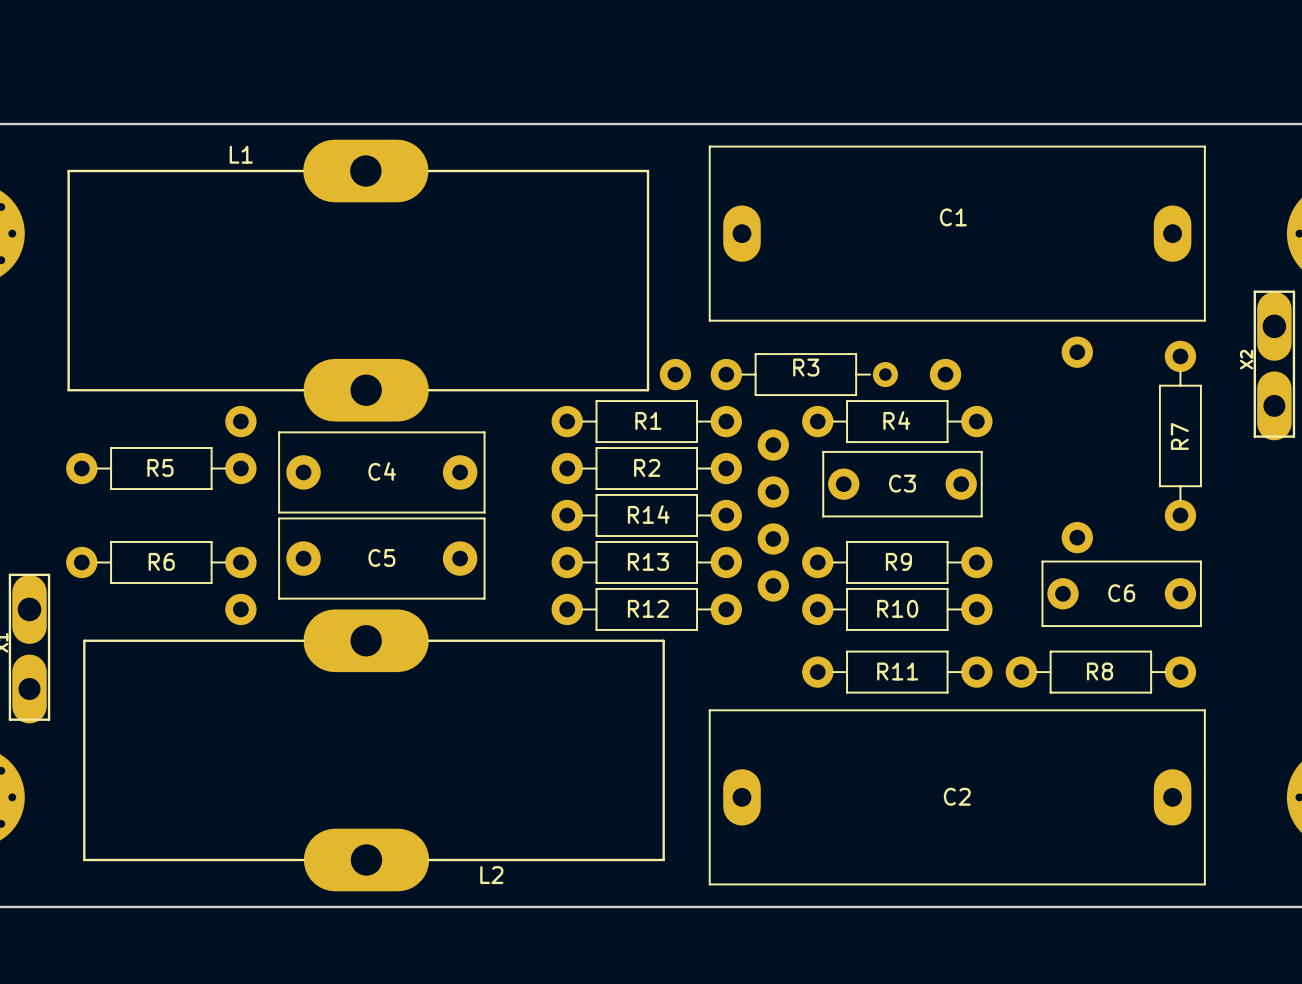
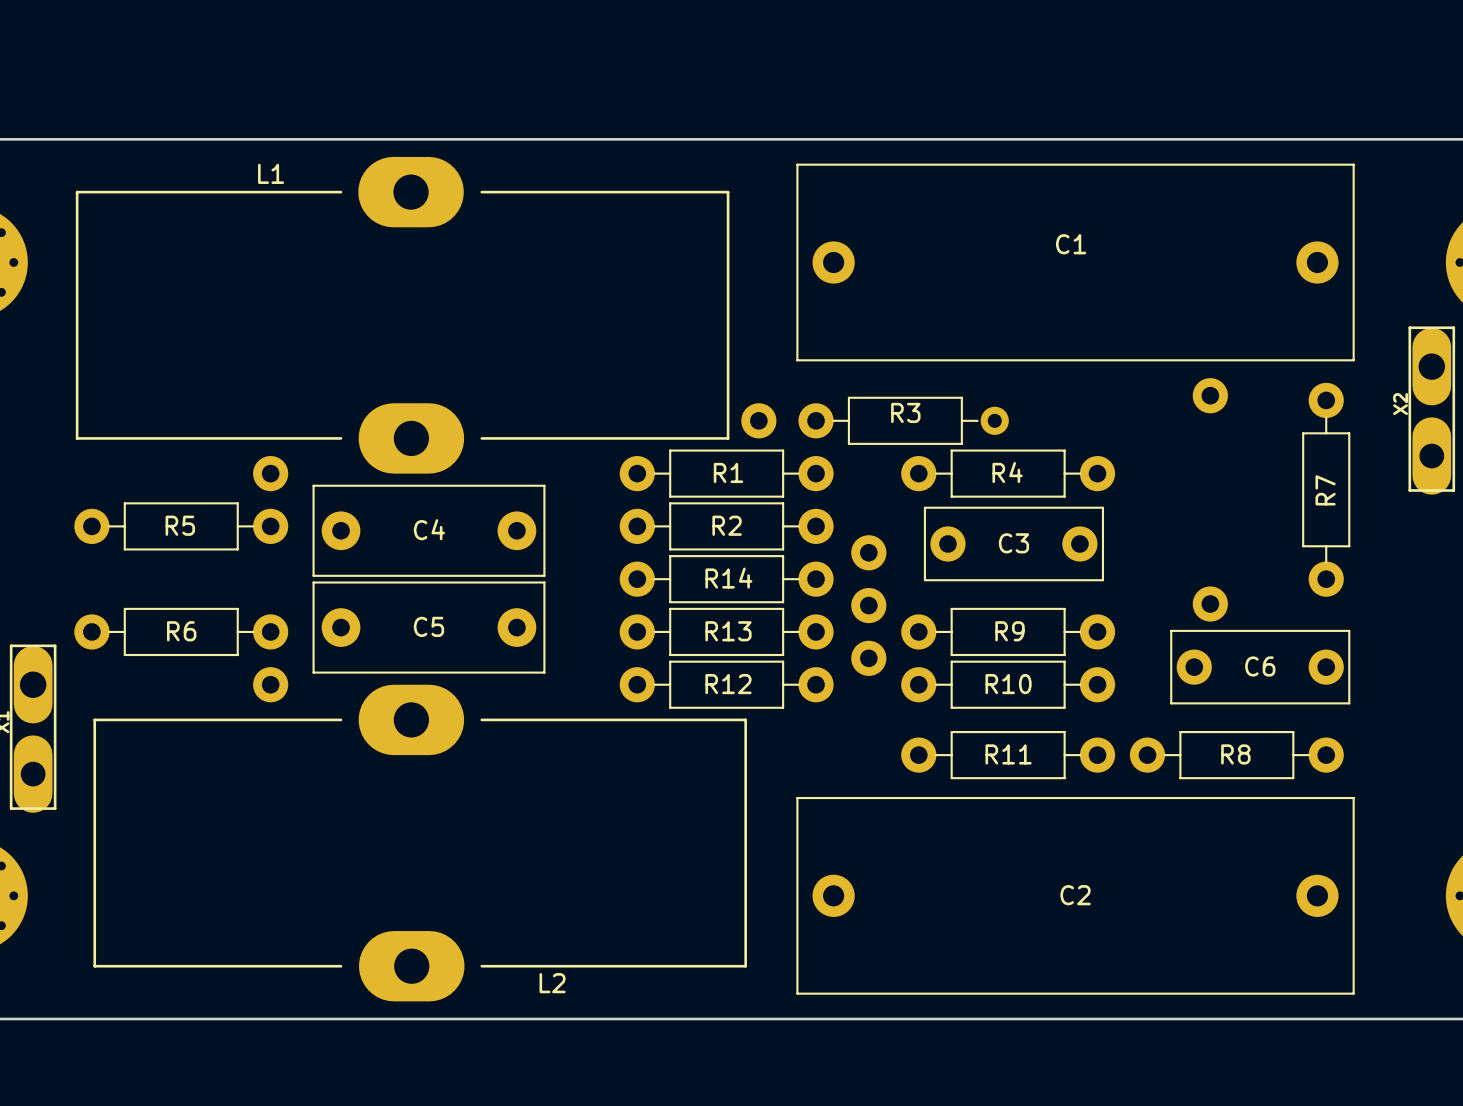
L1 footprint: [67, 139, 650, 422] -> [75, 156, 730, 474]
C1 footprint: [708, 145, 1206, 322] -> [796, 163, 1355, 362]
part: (945, 374) -> none
part: (773, 445) -> none
L2 footprint: [83, 609, 665, 892] -> [93, 684, 747, 1002]
C2 footprint: [708, 709, 1206, 886] -> [796, 796, 1355, 995]

